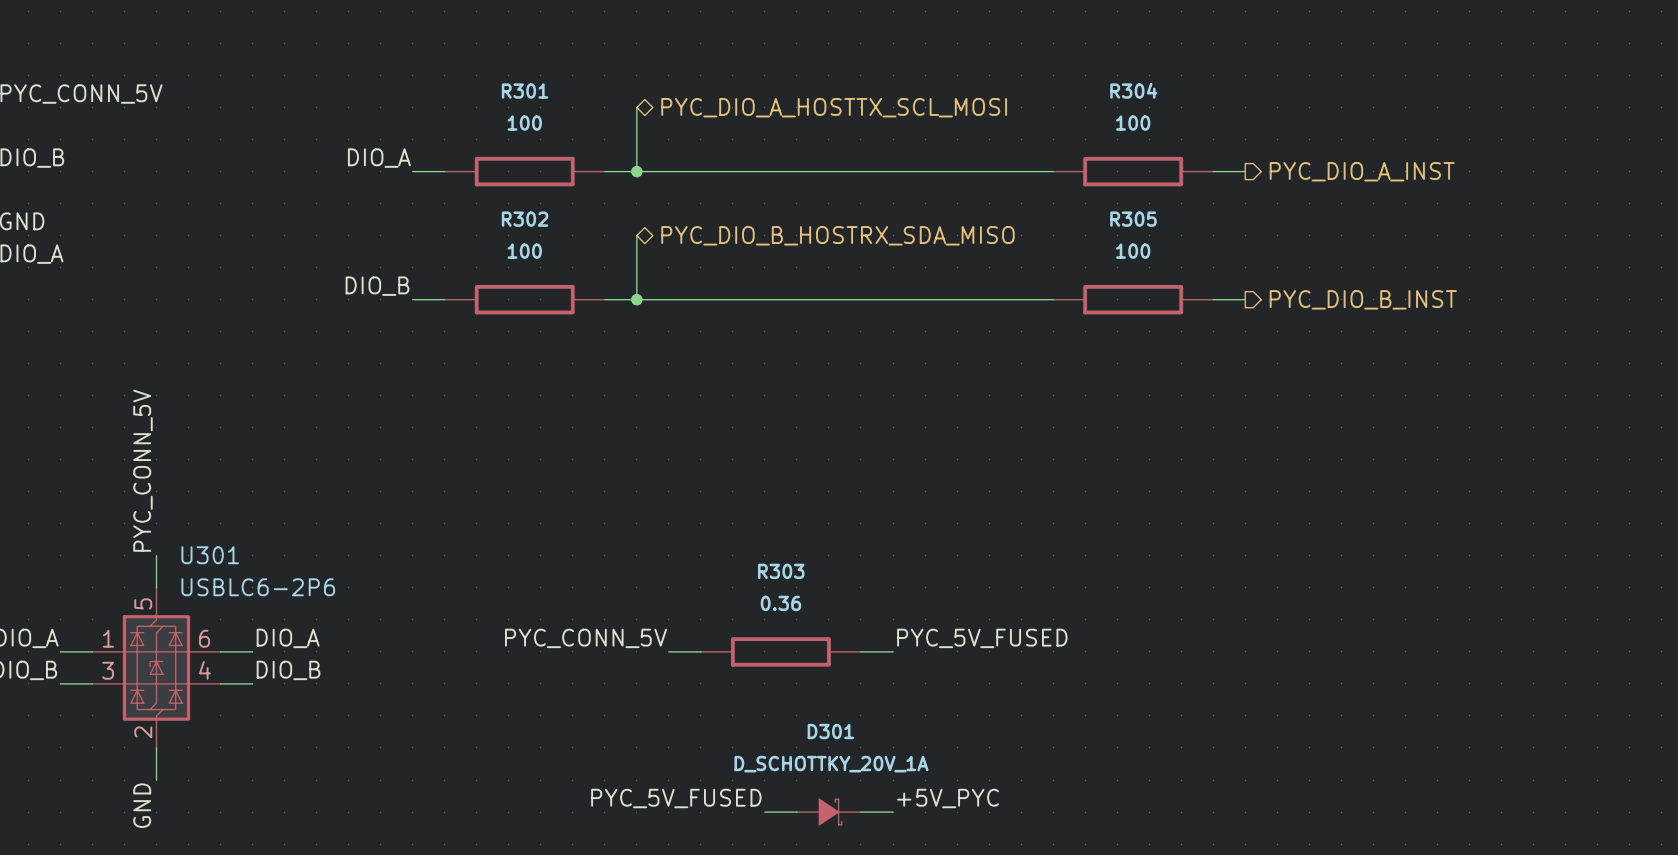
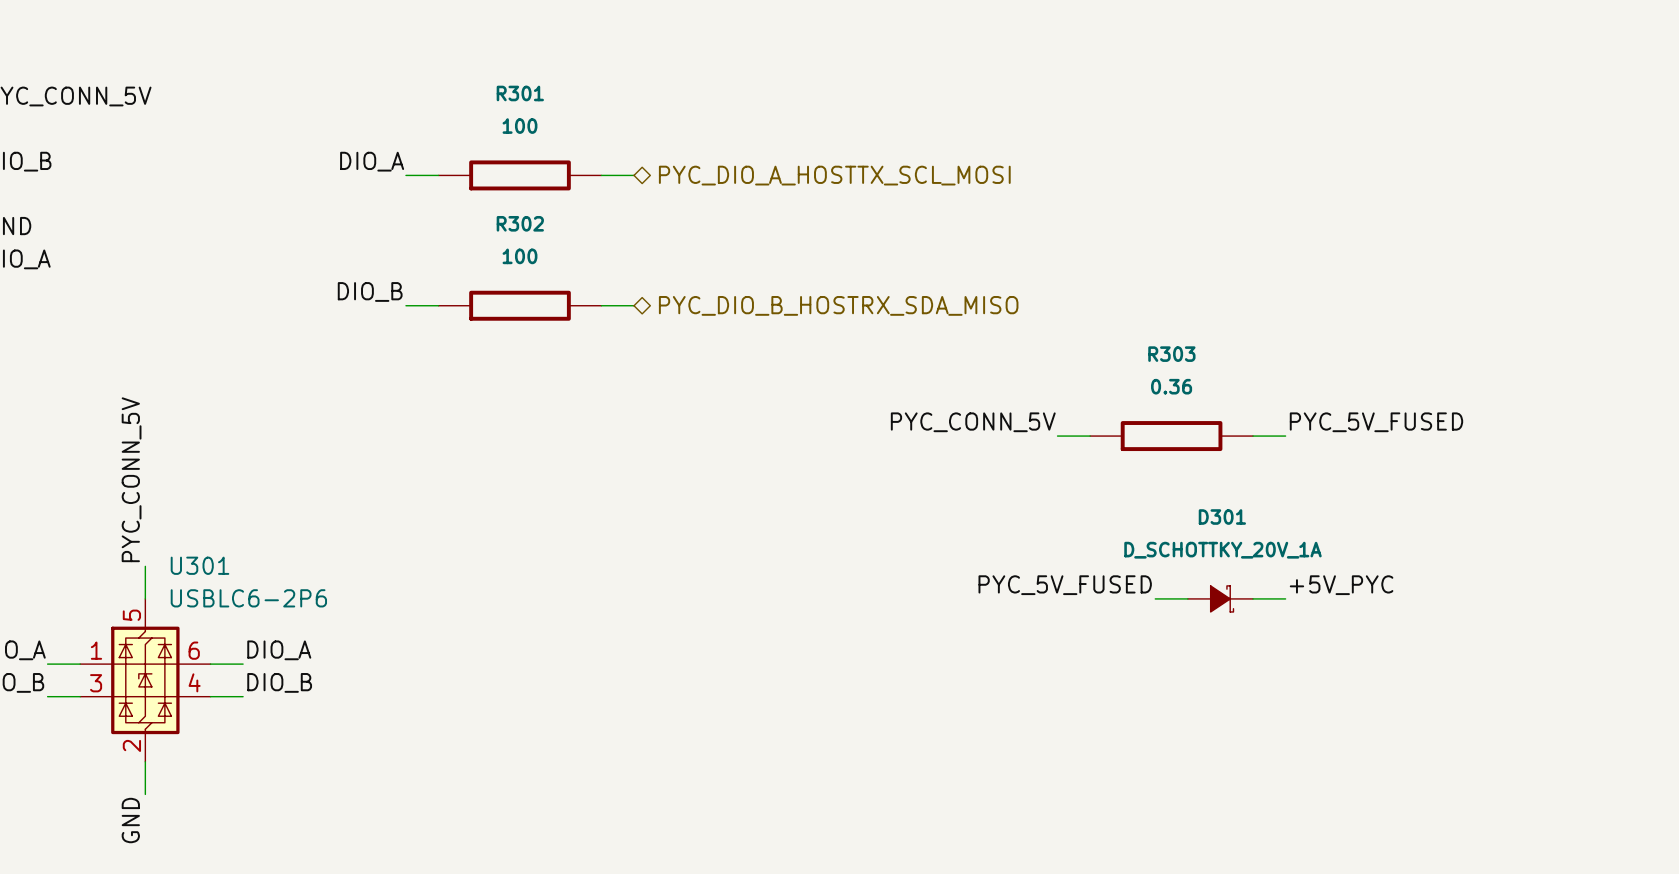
wire: (636, 107) (636, 171) (1053, 171) -> none
hierarchical label position: PYC_DIO_A_HOSTTX_SCL_MOSI (834, 107) -> PYC_DIO_A_HOSTTX_SCL_MOSI (834, 175)
junction: (636, 171) -> none
R304: 100 (1133, 171) -> none
wire: (1213, 171) (1245, 171) -> none
hierarchical label: PYC_DIO_A_INST (1362, 171) -> none
wire: (636, 235) (636, 299) (1053, 299) -> none
hierarchical label position: PYC_DIO_B_HOSTRX_SDA_MISO (837, 235) -> PYC_DIO_B_HOSTRX_SDA_MISO (838, 305)
junction: (636, 299) -> none
R305: 100 (1133, 299) -> none
wire: (1213, 299) (1245, 299) -> (1253, 436) (1285, 436)
hierarchical label: PYC_DIO_B_INST (1363, 299) -> none
label: none -> PYC_CONN_5V (973, 422)
label: none -> PYC_5V_FUSED (1376, 422)
label: none -> PYC_5V_FUSED (1065, 585)
label: none -> +5V_PYC (1341, 585)
wire: none -> (1155, 598) (1187, 598)
wire: none -> (1253, 598) (1285, 598)
label: PYC_CONN_5V (586, 638) -> none
label: PYC_5V_FUSED (982, 638) -> none
wire: (668, 651) (700, 651) -> none
R303 position: (780, 651) -> (1171, 436)
wire: (860, 651) (893, 651) -> (1057, 436) (1090, 436)
label: PYC_5V_FUSED (676, 798) -> none
label: +5V_PYC (948, 798) -> none
wire: (764, 812) (796, 812) -> none
D301 position: (828, 812) -> (1220, 598)
wire: (860, 812) (893, 812) -> none

